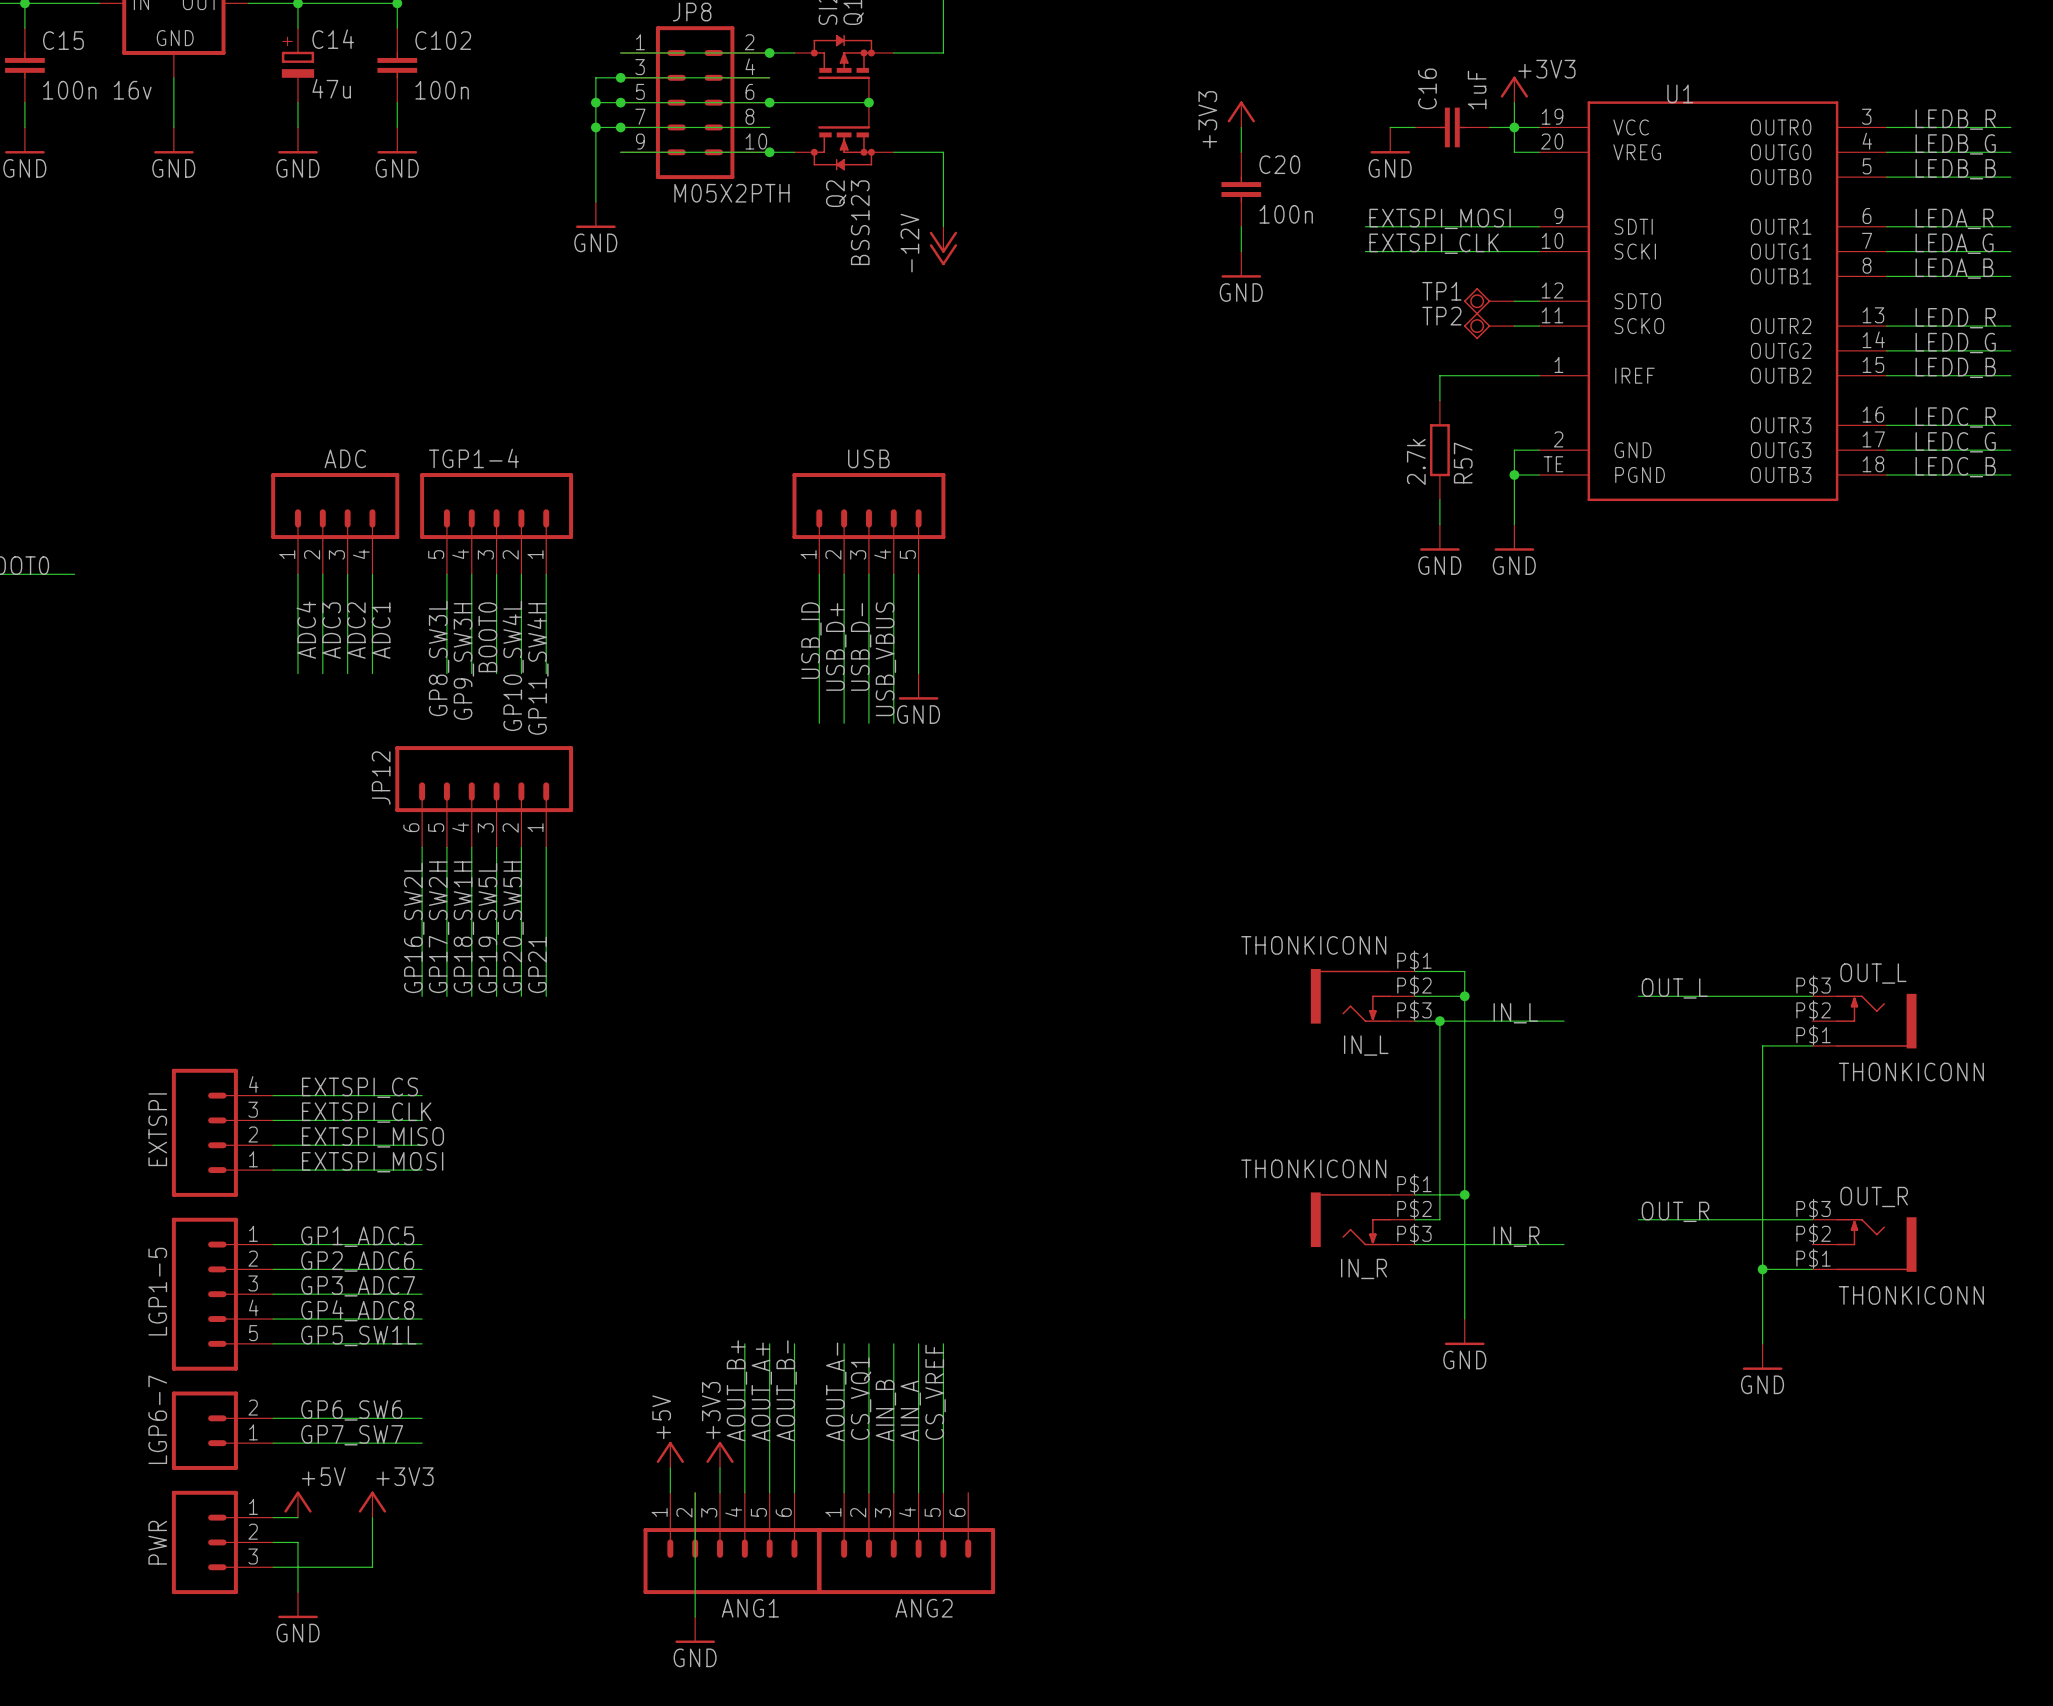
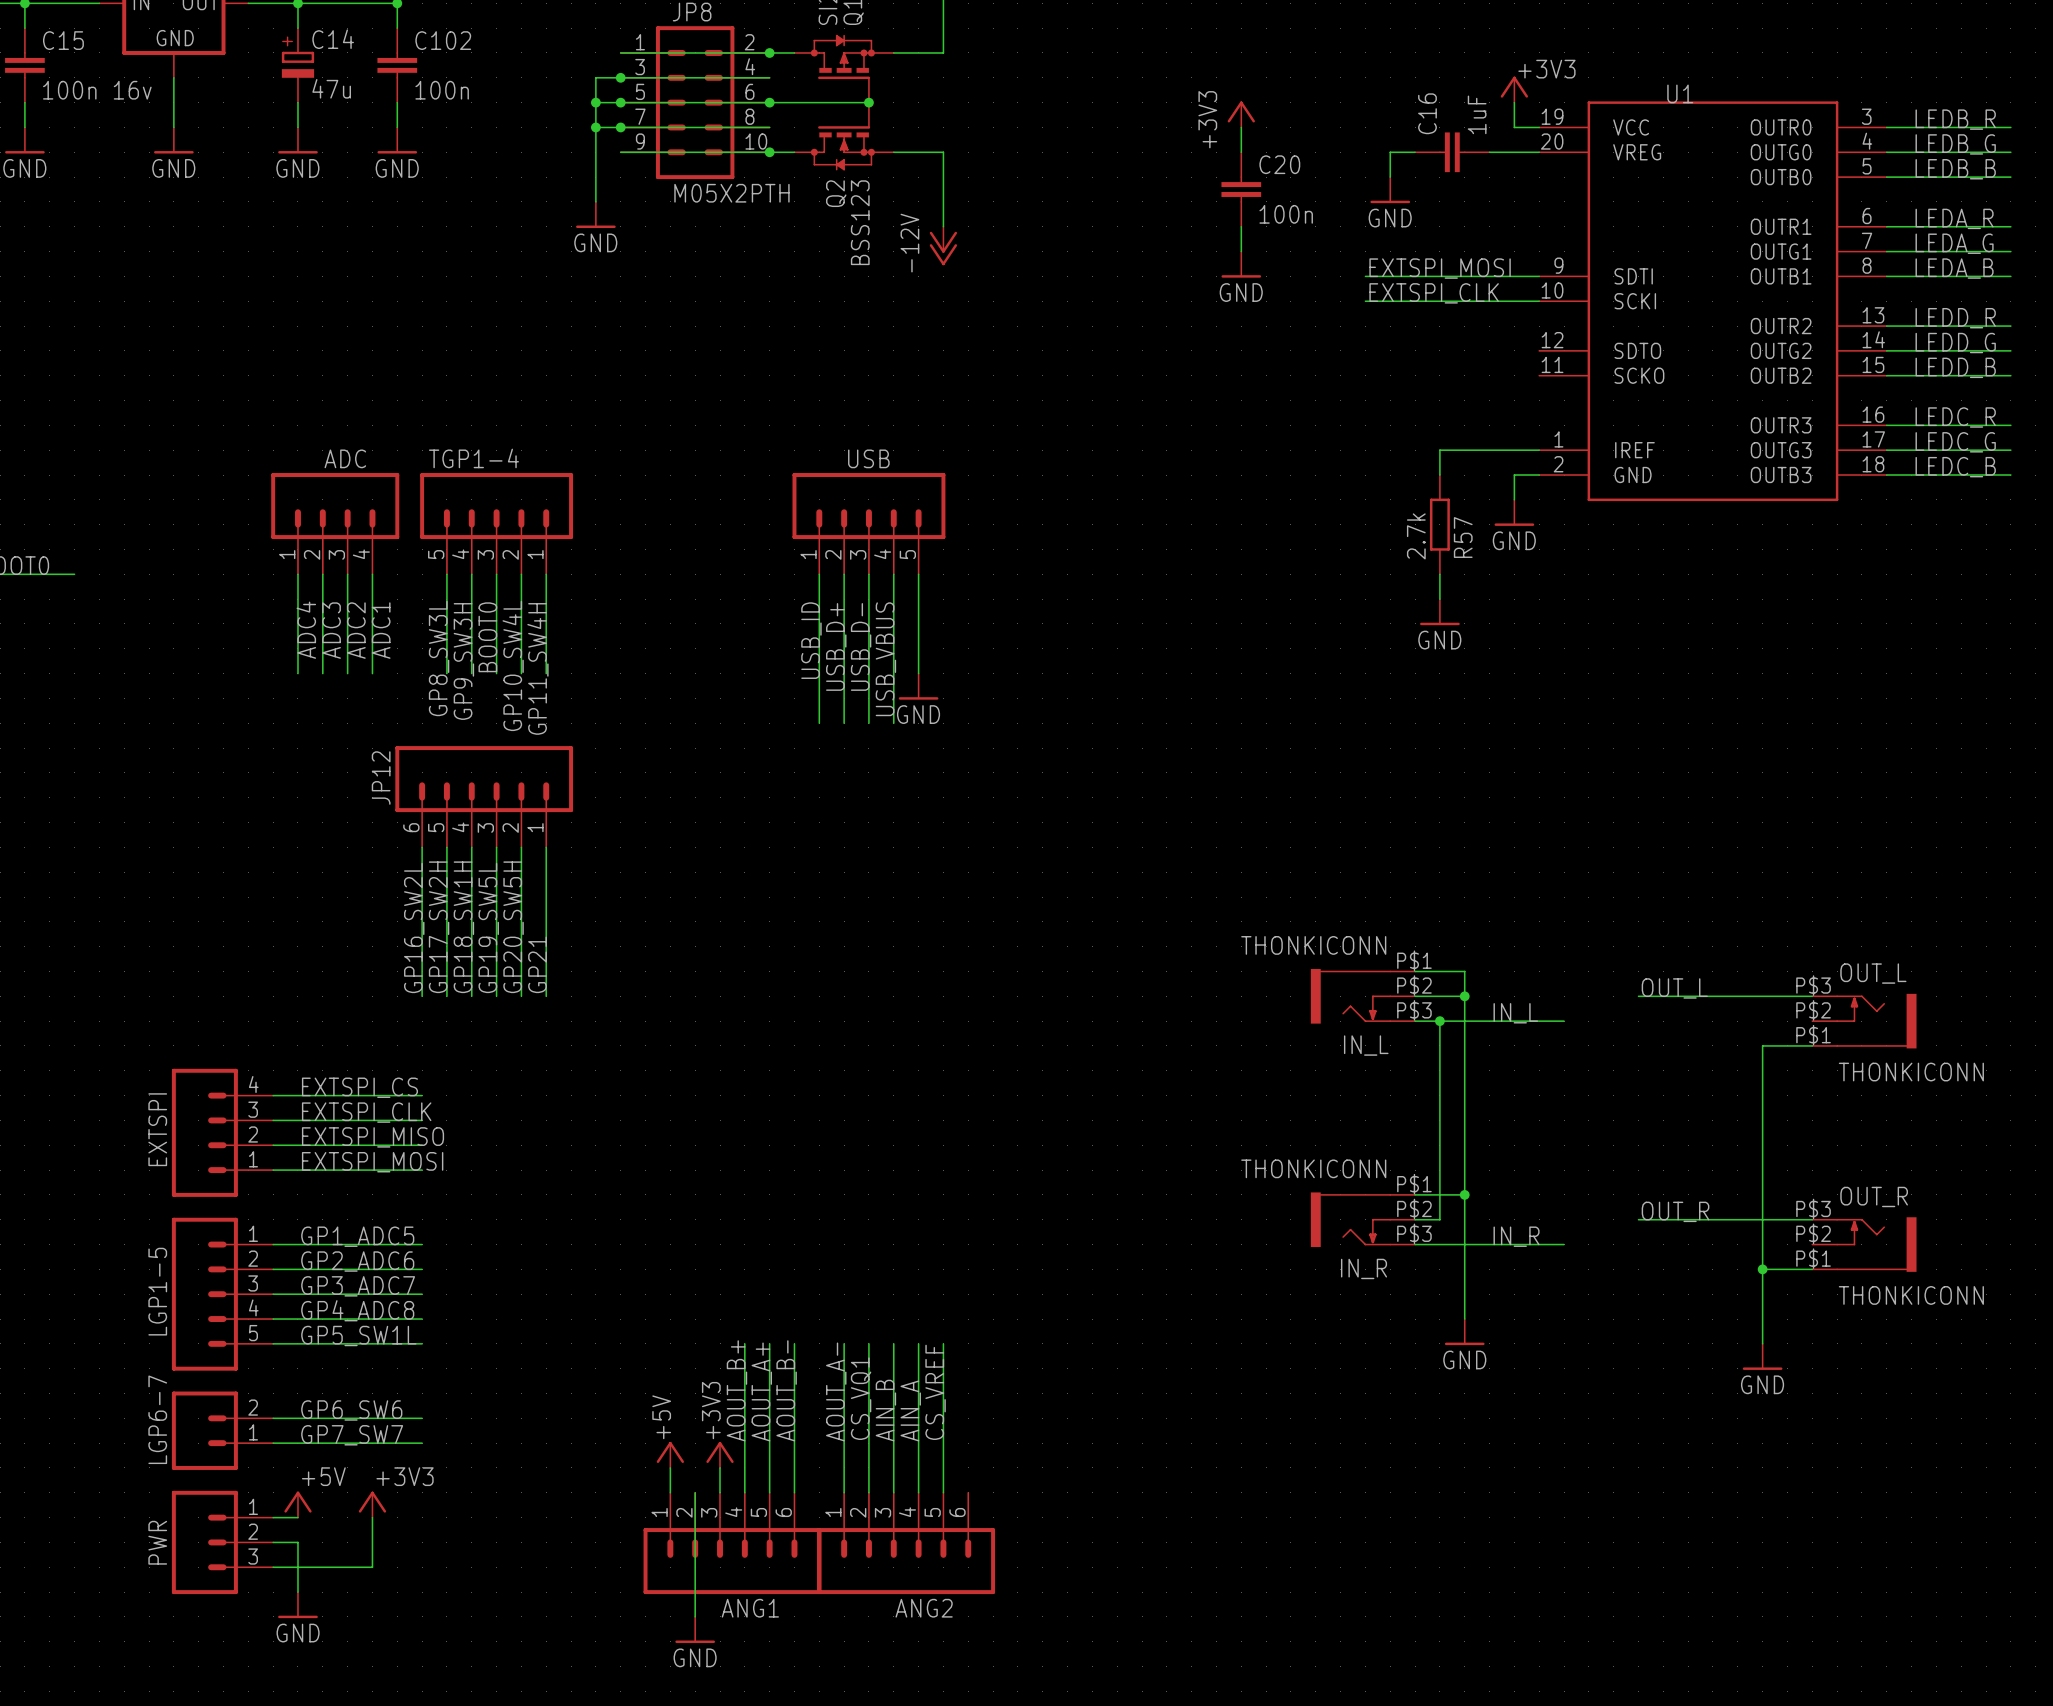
U1 symbol: [1539, 101, 1887, 502] -> [1539, 101, 1887, 502]
wire: (1390, 127) (1415, 127) -> none
C16 position: (1452, 127) -> (1452, 152)
wire: (1489, 127) (1514, 127) (1514, 152) -> (1489, 152) (1514, 152)
junction: (1514, 127) -> none
power symbol position: GND (1390, 140) -> GND (1390, 190)
wire: none -> (1415, 152) (1390, 152) (1390, 177)
label position: EXTSPI_MOSI (1440, 218) -> EXTSPI_MOSI (1440, 268)
wire: (1365, 226) (1539, 226) -> none
label position: EXTSPI_CLK (1434, 243) -> EXTSPI_CLK (1434, 293)
wire: (1365, 251) (1539, 251) -> (1365, 276) (1539, 276)
wire: none -> (1365, 301) (1514, 301)
TP1: (1489, 301) -> none
TP2: (1489, 326) -> none
wire: (1514, 326) (1539, 326) -> none
wire: (1539, 375) (1439, 375) (1439, 400) -> none
R57 position: (1439, 450) -> (1439, 524)
wire: (1514, 450) (1514, 475) -> (1514, 450) (1439, 450) (1439, 475)
junction: (1514, 475) -> none
wire: (1439, 499) (1439, 524) -> (1439, 574) (1439, 599)
power symbol: GND (1439, 537) -> none
power symbol position: GND (1514, 537) -> GND (1514, 512)
power symbol: none -> GND (1439, 612)

